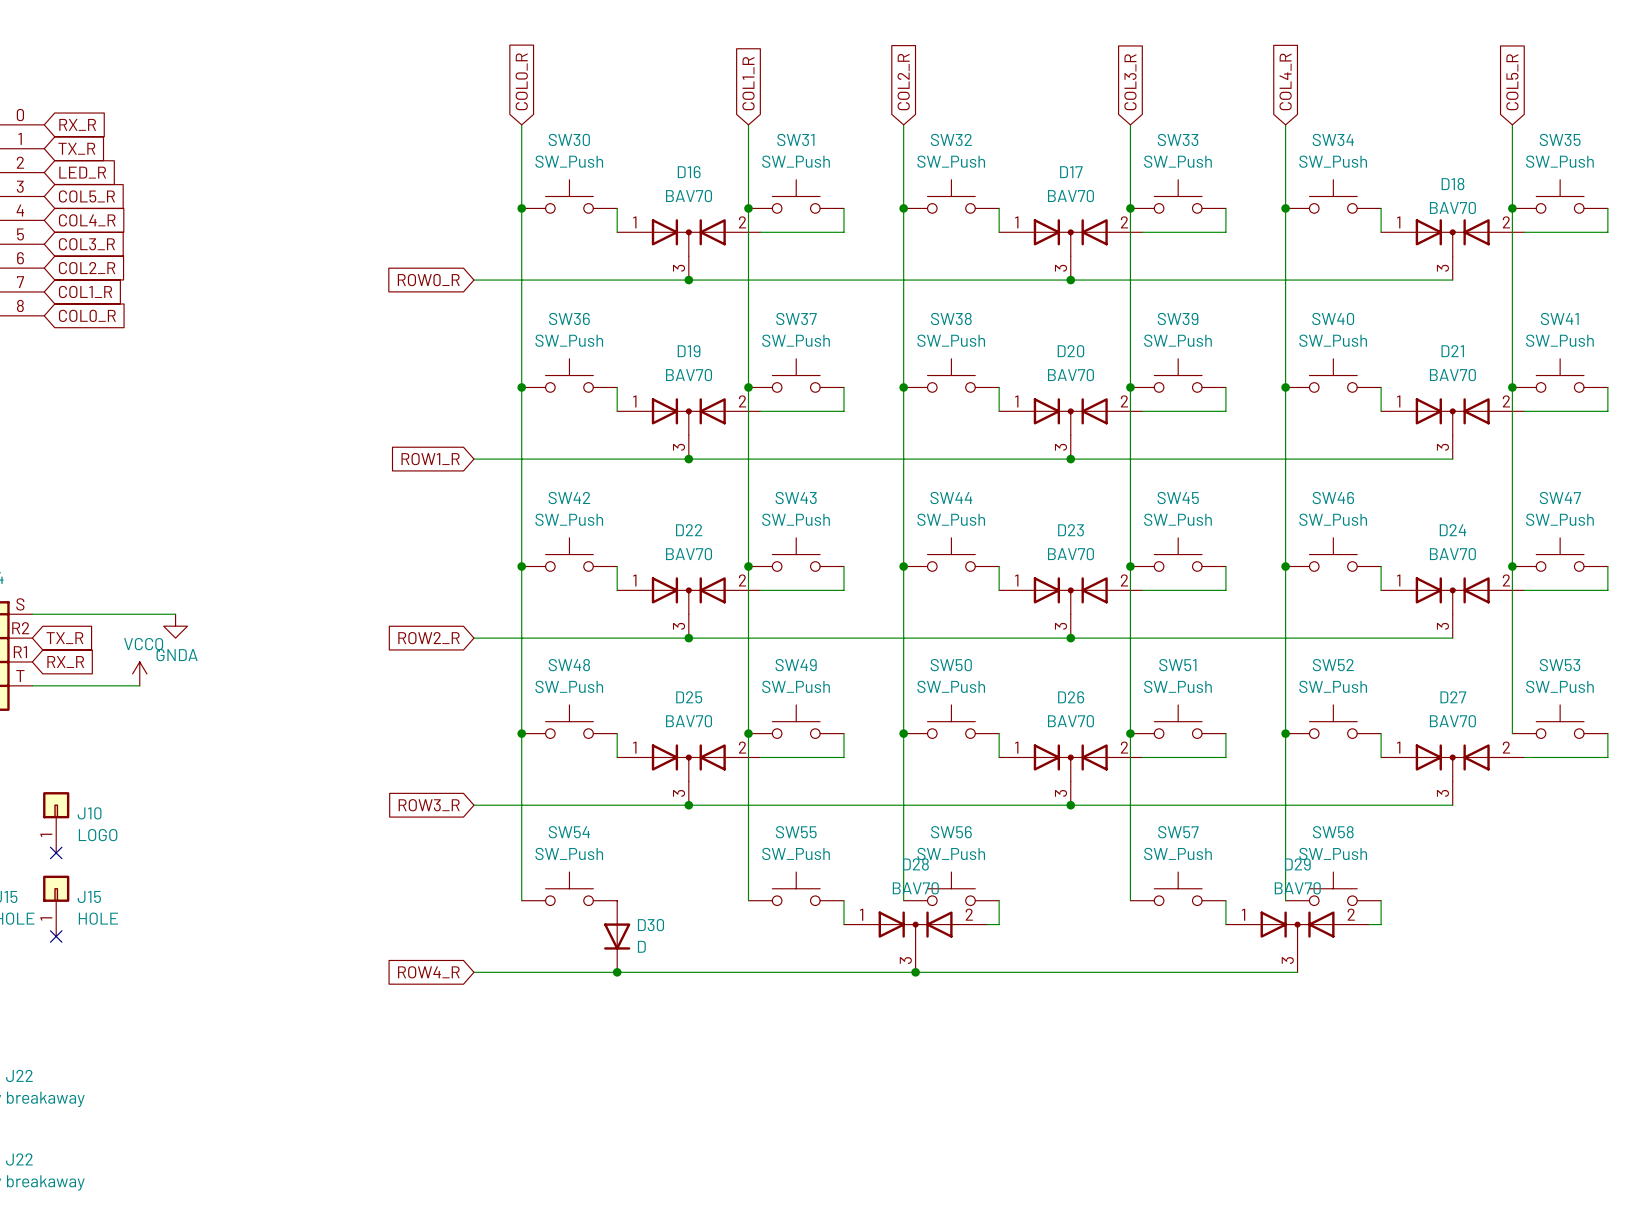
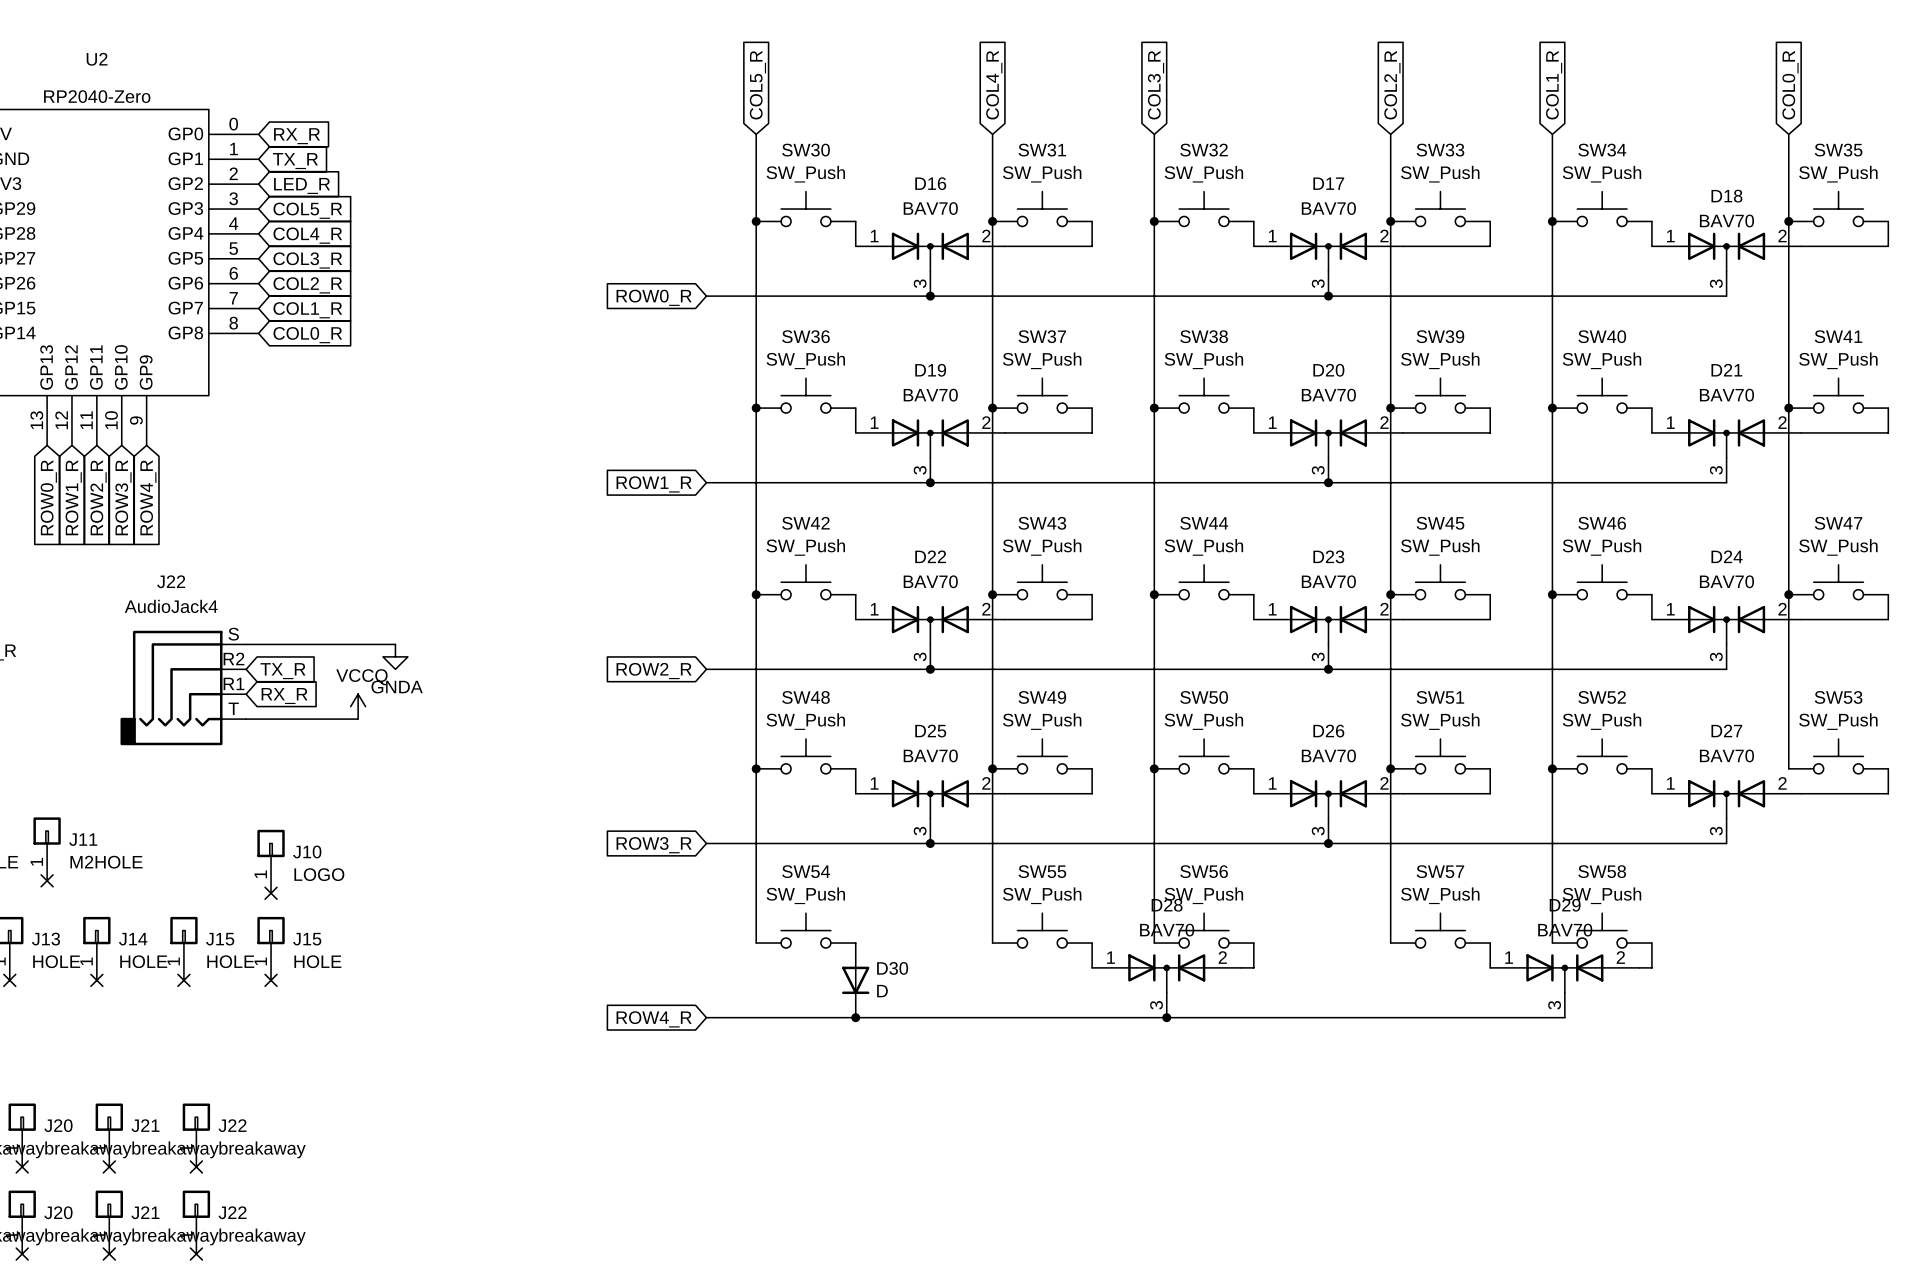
global label: COL0_R (521, 81) -> COL5_R (757, 85)
global label: COL4_R (1285, 81) -> COL1_R (1554, 85)
global label: COL2_R (903, 82) -> COL3_R (1156, 85)
global label: COL3_R (1130, 82) -> COL2_R (1392, 85)
global label: COL5_R (1512, 82) -> COL0_R (1790, 85)
global label: COL1_R (748, 83) -> COL4_R (994, 85)

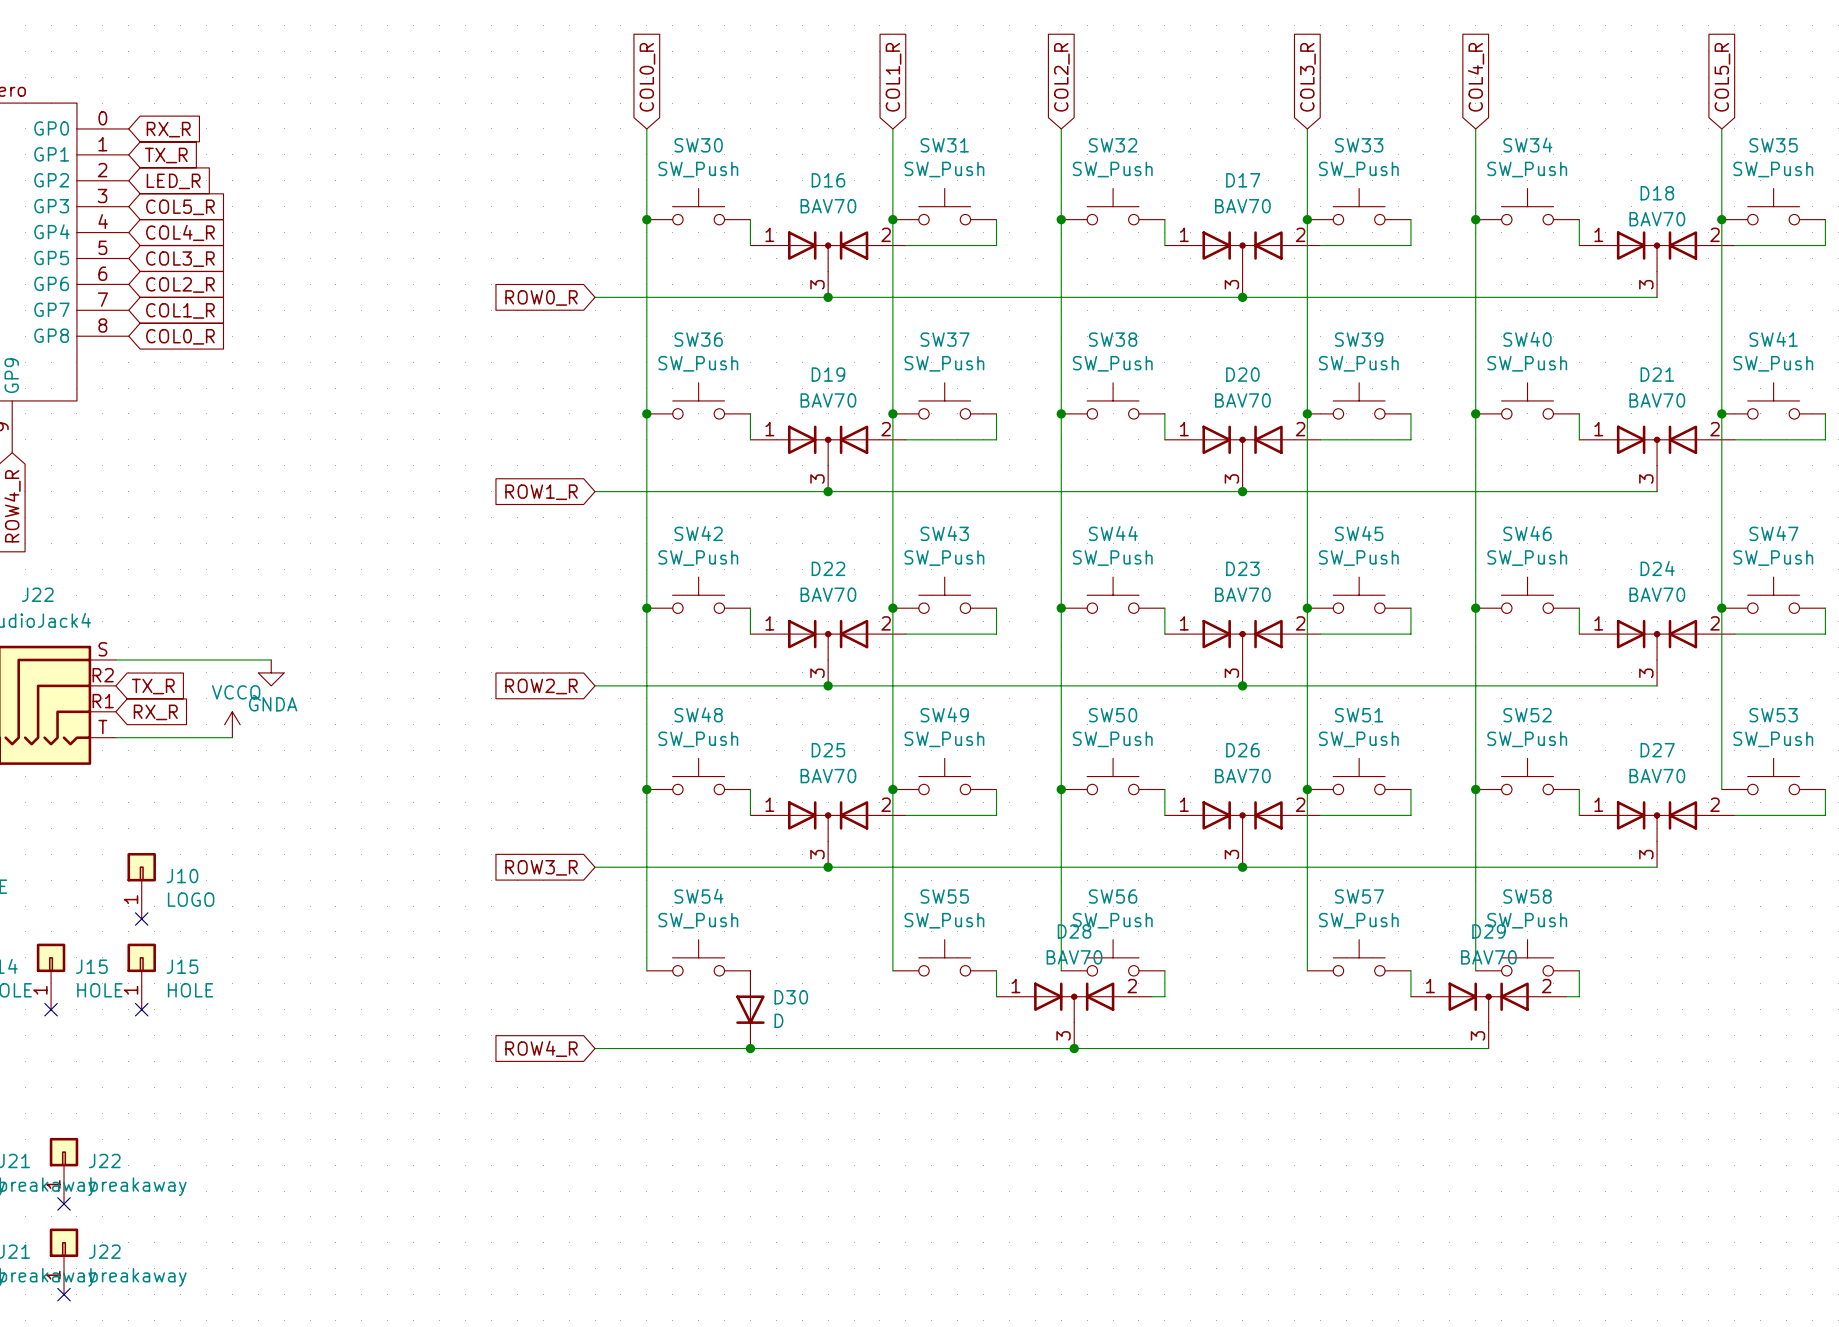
global label: COL5_R (757, 85) -> COL0_R (647, 77)
global label: COL4_R (994, 85) -> COL1_R (893, 77)
global label: COL3_R (1156, 85) -> COL2_R (1061, 77)
global label: COL2_R (1392, 85) -> COL3_R (1307, 77)
global label: COL1_R (1554, 85) -> COL4_R (1476, 77)
global label: COL0_R (1790, 85) -> COL5_R (1722, 77)

